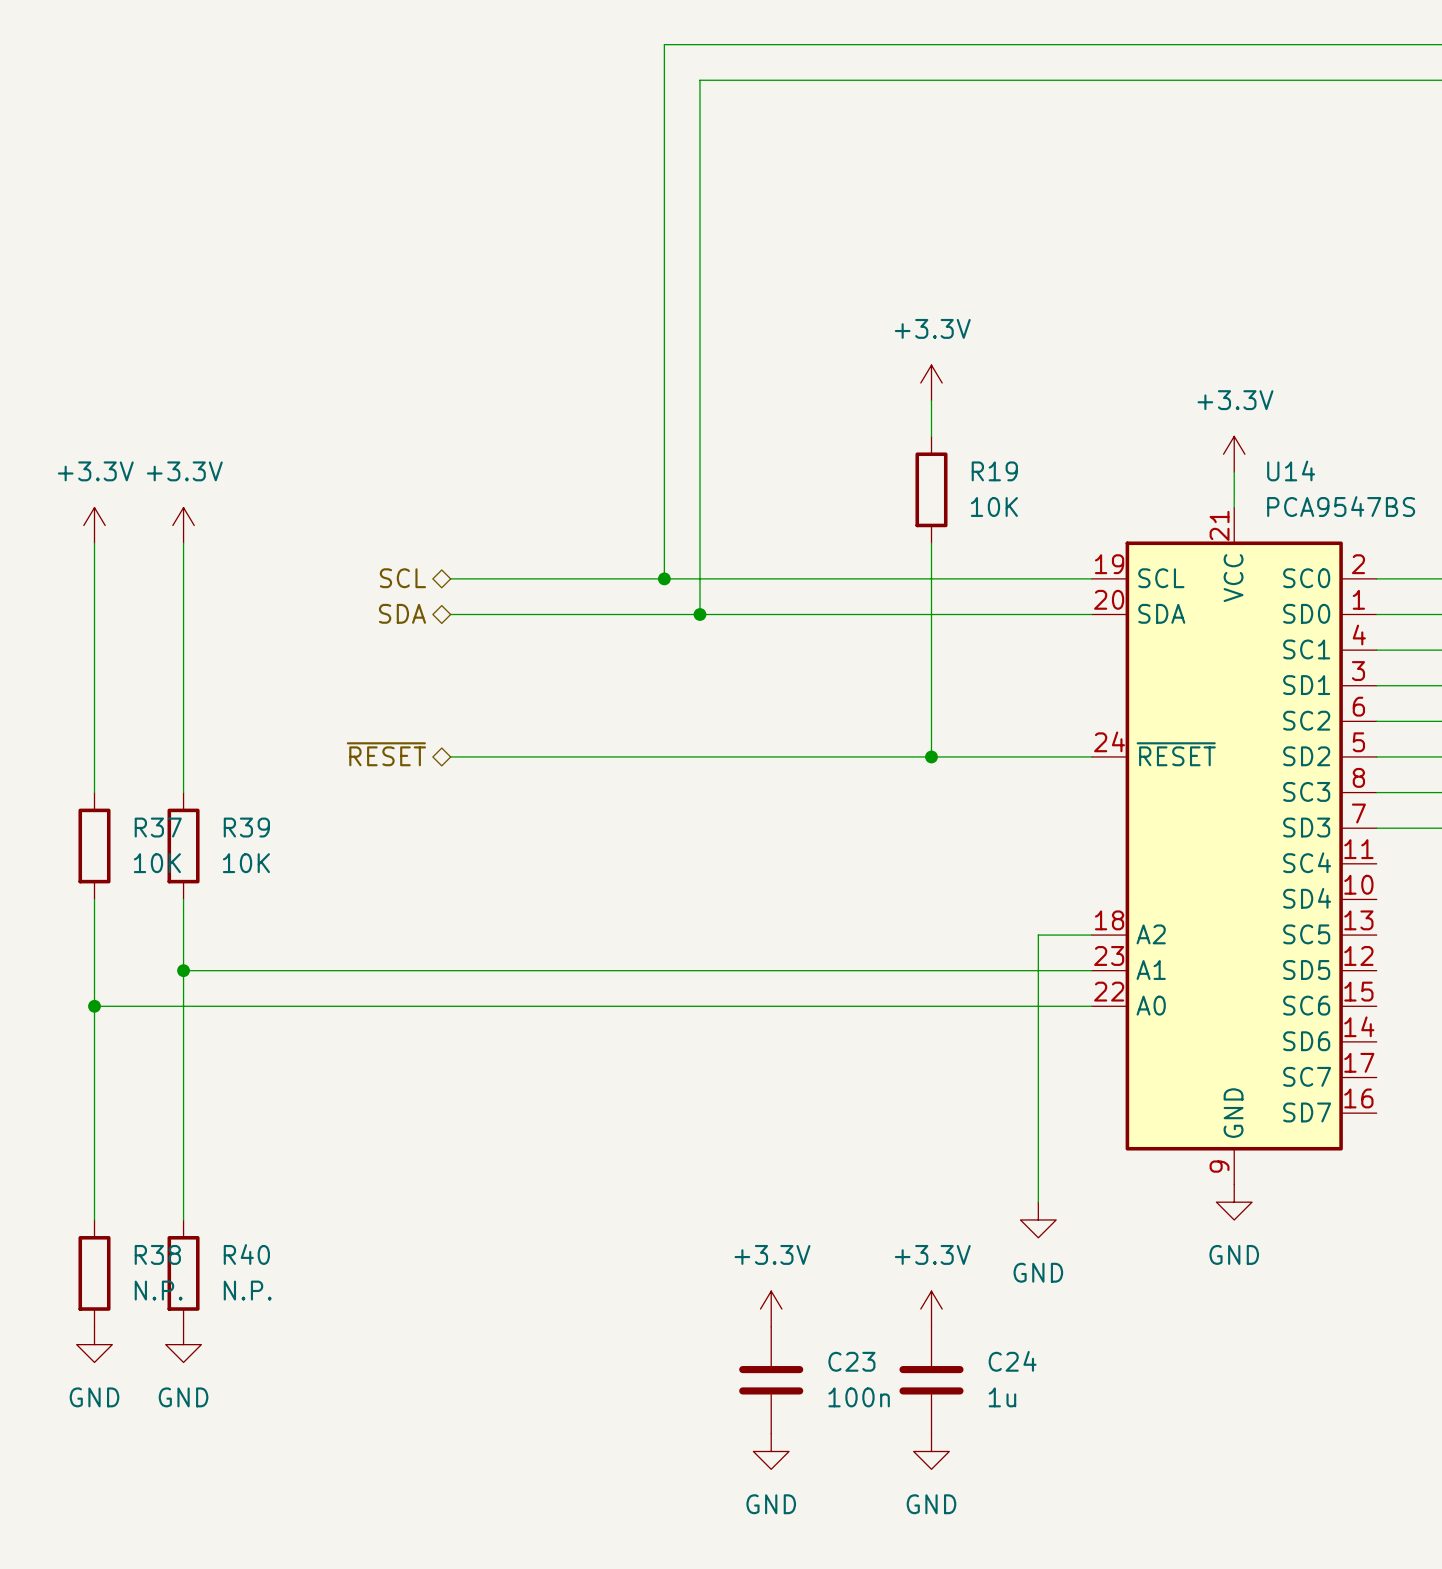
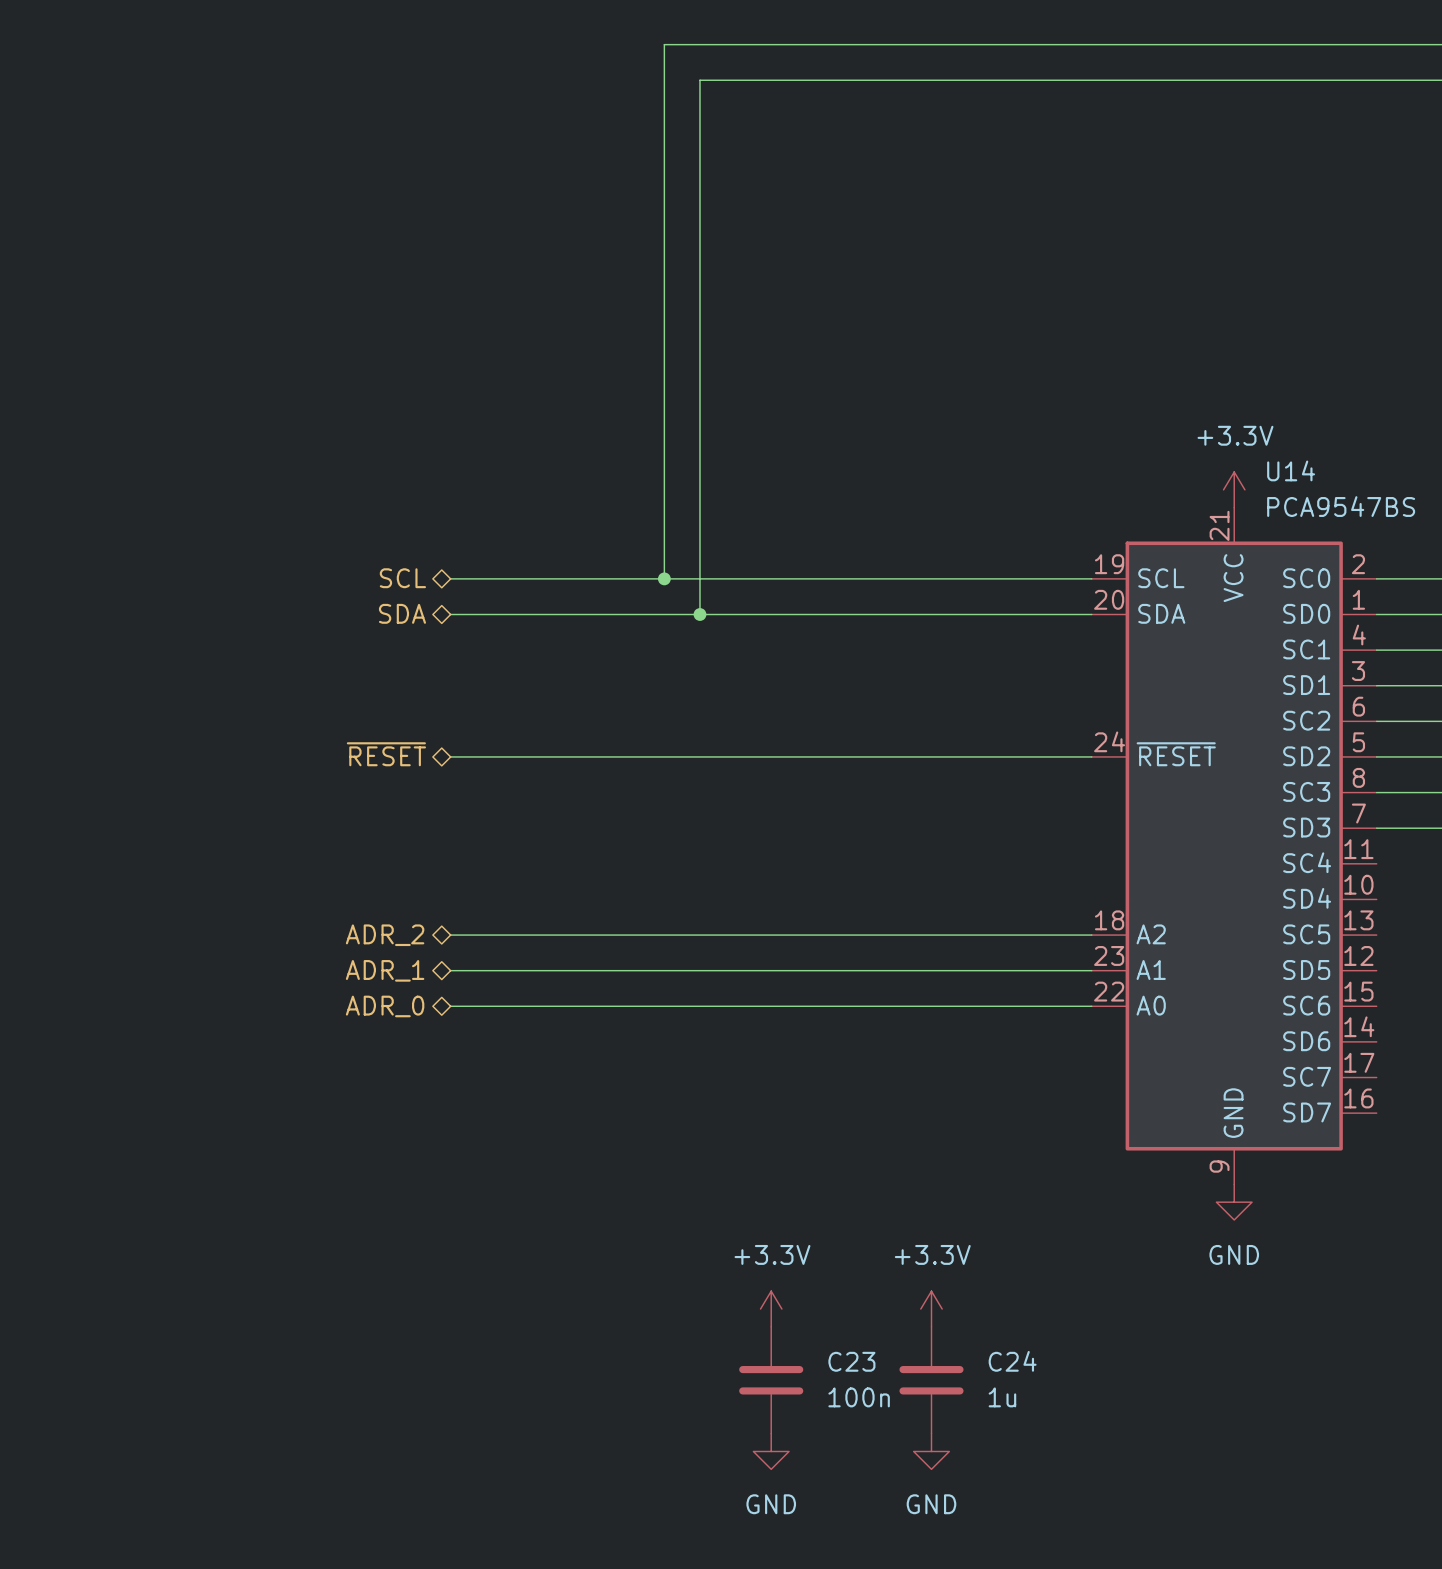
power symbol: +3.3V (931, 383) -> none
wire: (931, 400) (931, 436) -> none
power symbol position: +3.3V (1234, 454) -> +3.3V (1234, 489)
R19: 10K (931, 489) -> none
power symbol: +3.3V (94, 525) -> none
power symbol: +3.3V (183, 525) -> none
wire: (94, 543) (94, 792) -> none
wire: (183, 543) (183, 792) -> none
wire: (931, 543) (931, 756) -> none
junction: (931, 756) -> none
R37: 10K (94, 846) -> none
R39: 10K (183, 846) -> none
wire: (94, 899) (94, 1219) -> none
wire: (183, 899) (183, 1219) -> none
hierarchical label: none -> ADR_2 (385, 935)
wire: (1038, 935) (1038, 1202) -> (1038, 935) (450, 935)
wire: (183, 970) (450, 970) -> none
junction: (183, 970) -> none
hierarchical label: none -> ADR_1 (385, 970)
wire: (94, 1006) (450, 1006) -> none
junction: (94, 1006) -> none
hierarchical label: none -> ADR_0 (385, 1006)
power symbol: GND (1038, 1219) -> none
R38: N.P. (94, 1273) -> none
R40: N.P. (183, 1273) -> none
power symbol: GND (94, 1344) -> none
power symbol: GND (183, 1344) -> none

